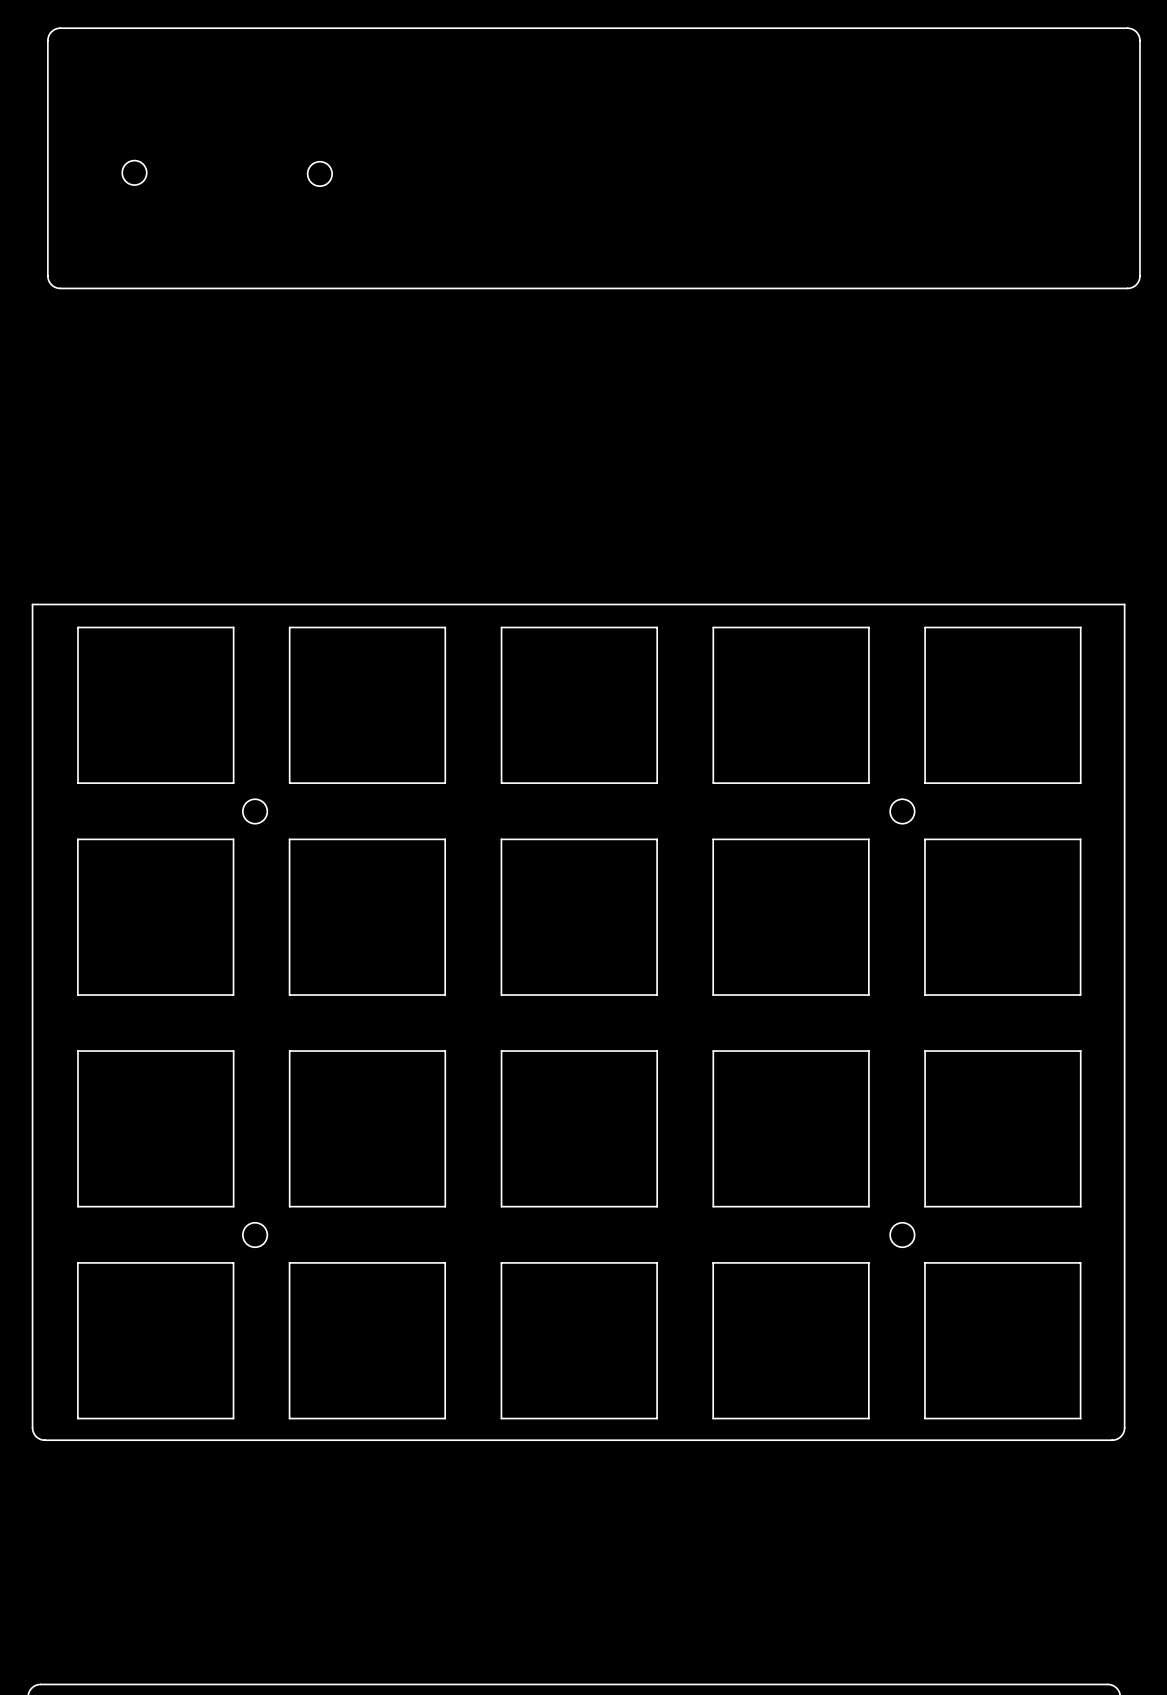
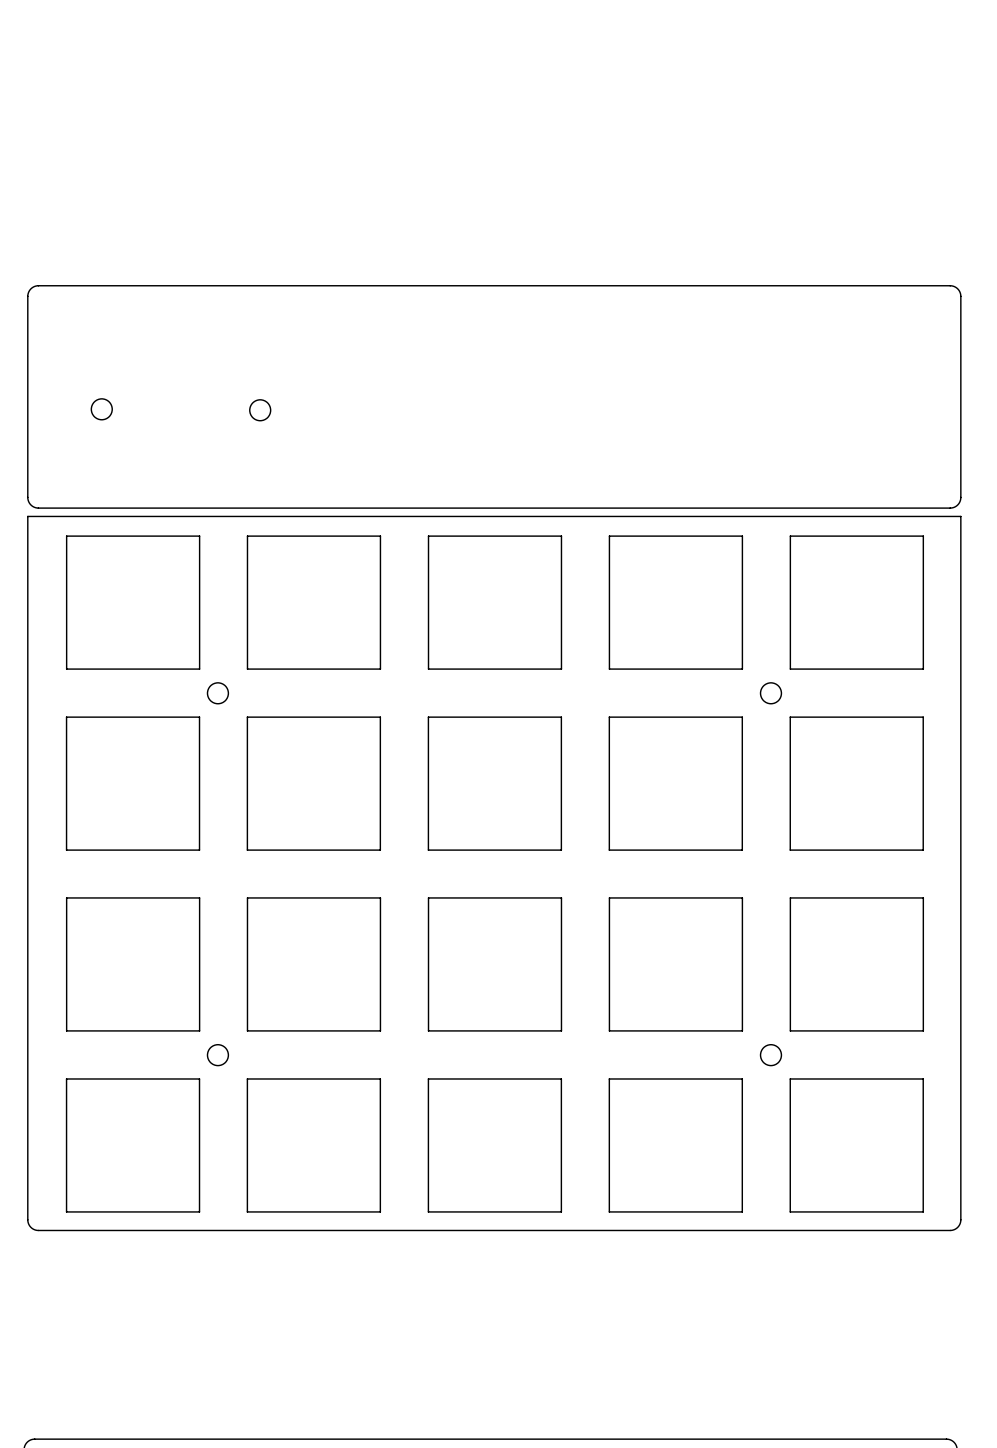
board edge: (60, 28) (1130, 28) (1137, 33) (1139, 40) (1139, 279) (1135, 285) (1127, 288) (57, 288) (50, 283) (47, 275) (47, 40) (51, 31) (60, 28) -> none
round board edge: [121, 159, 148, 186] -> none
round board edge: [306, 160, 333, 188] -> none
board edge: none -> (38, 285) (952, 286) (958, 289) (960, 296) (960, 500) (956, 505) (950, 508) (35, 507) (29, 503) (27, 497) (27, 296) (30, 288) (38, 285)
round board edge: none -> [90, 398, 113, 421]
round board edge: none -> [249, 399, 272, 422]

